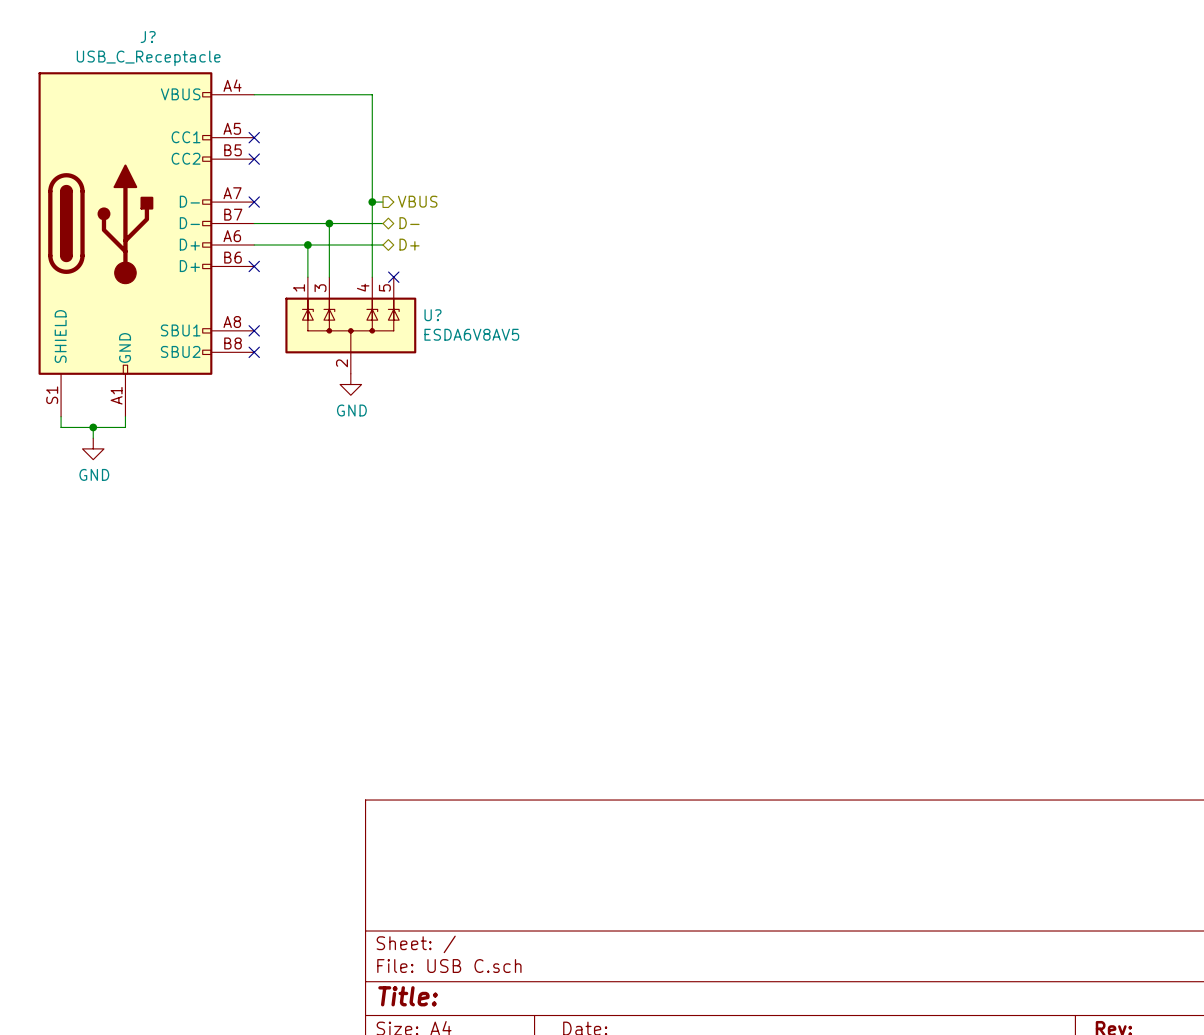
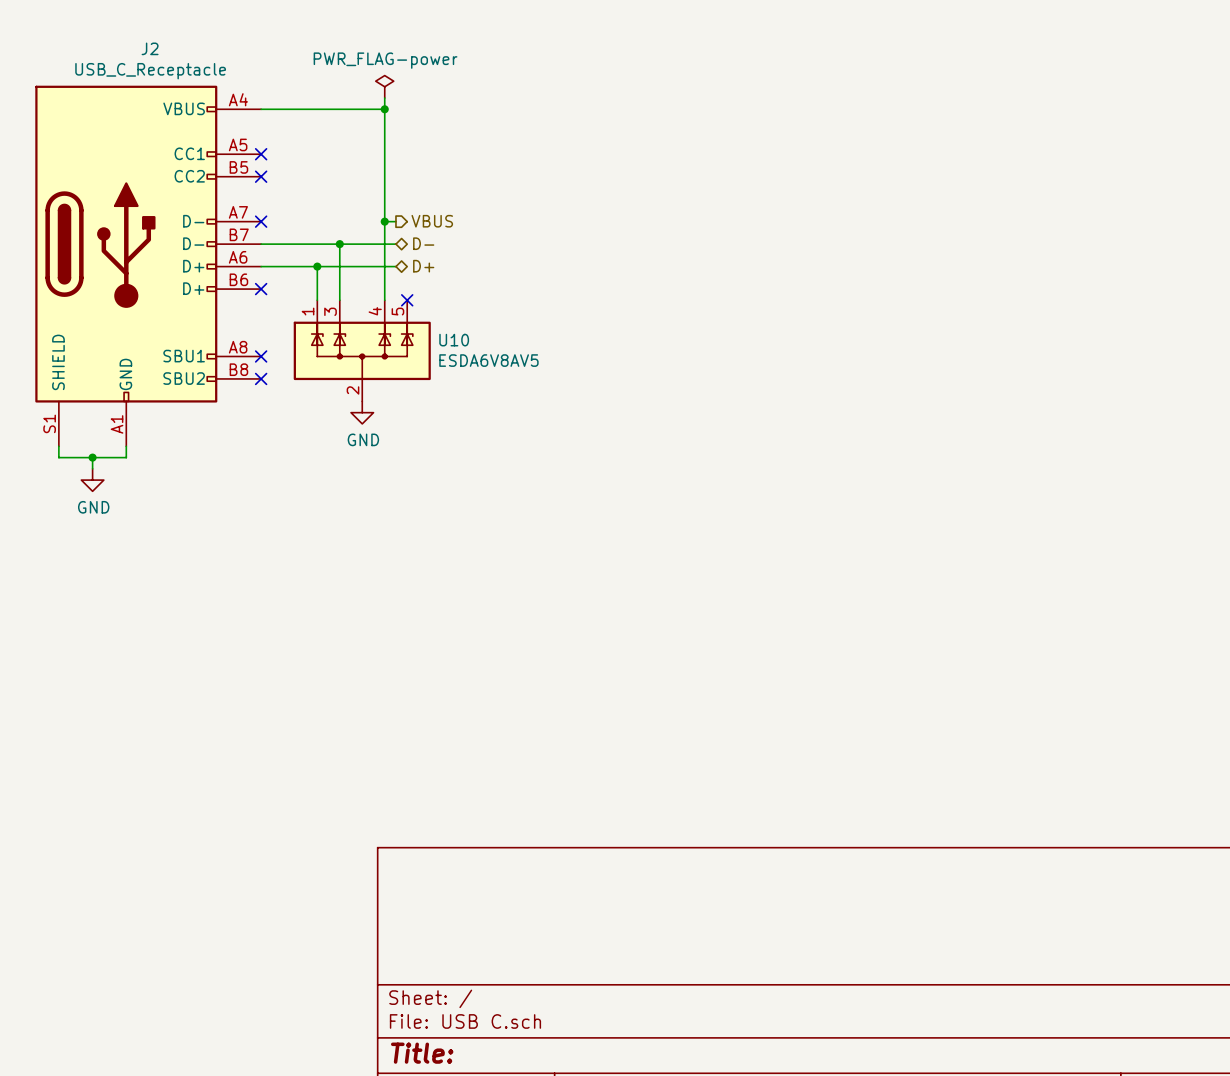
J? name: J? (148, 37) -> J2 (150, 48)
power symbol: none -> PWR_FLAG-power (384, 86)
wire: none -> (384, 98) (384, 109)
junction: none -> (384, 109)
U? name: U? (432, 315) -> U10 (454, 340)

